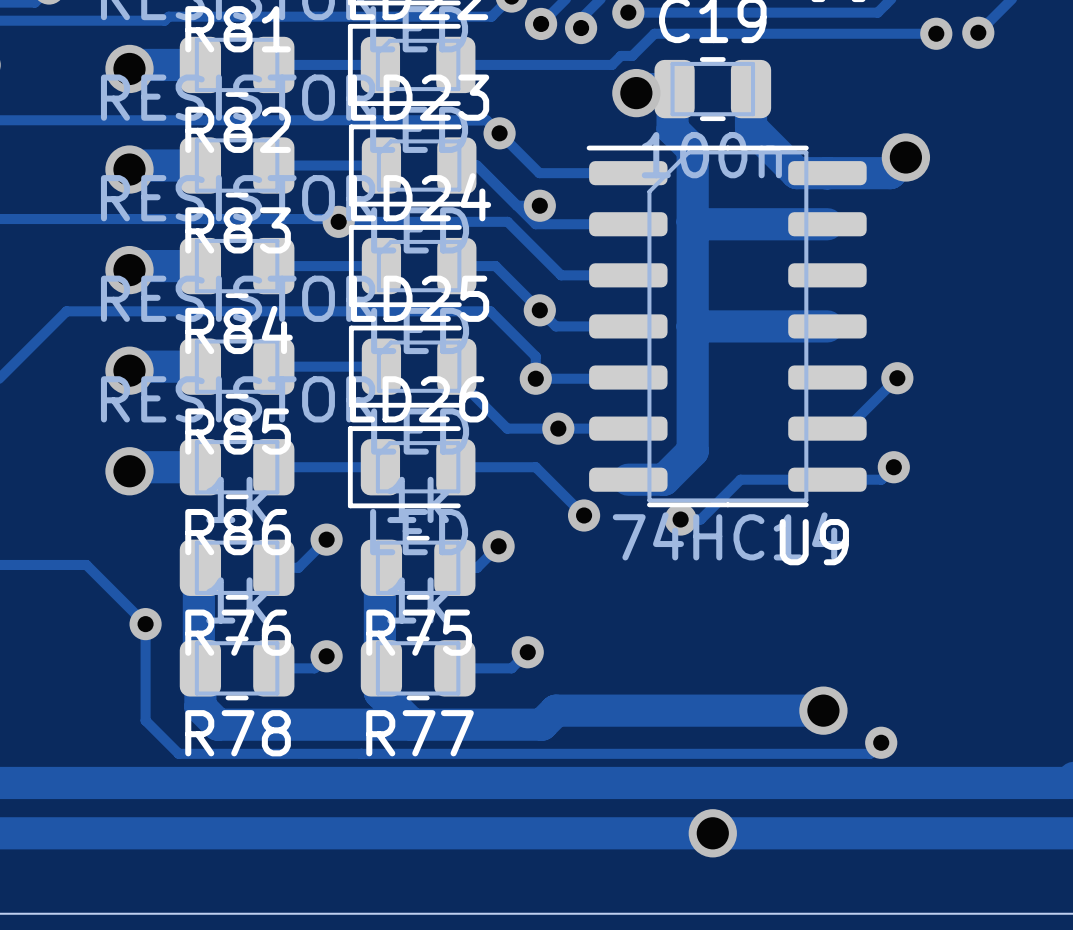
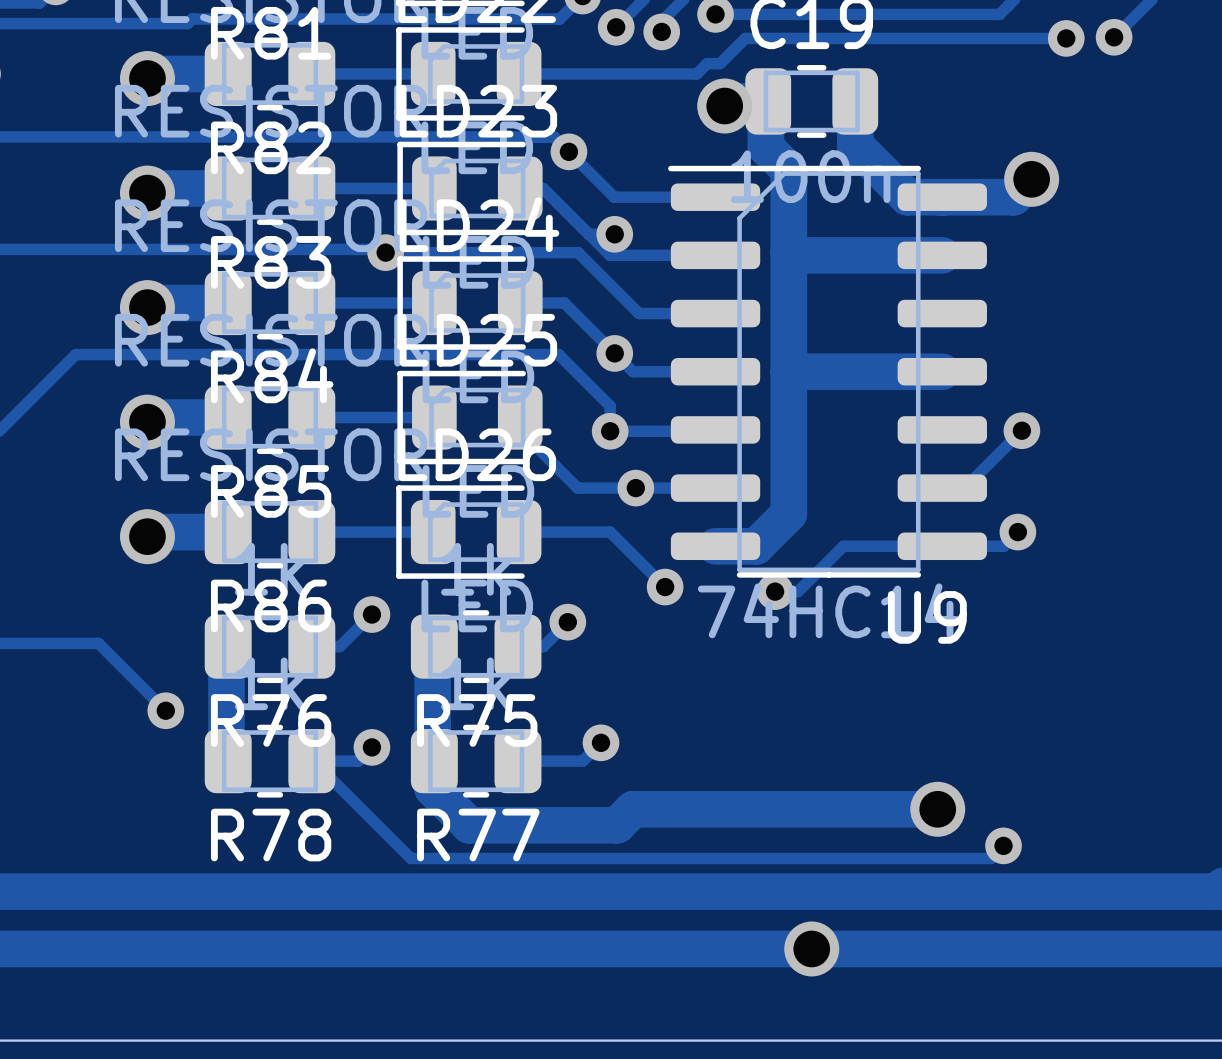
track: (145, 624) (145, 720) (178, 753) (360, 753) -> (313, 761) (410, 858)
track: (200, 668) (200, 707) (217, 724) (412, 724) -> none

